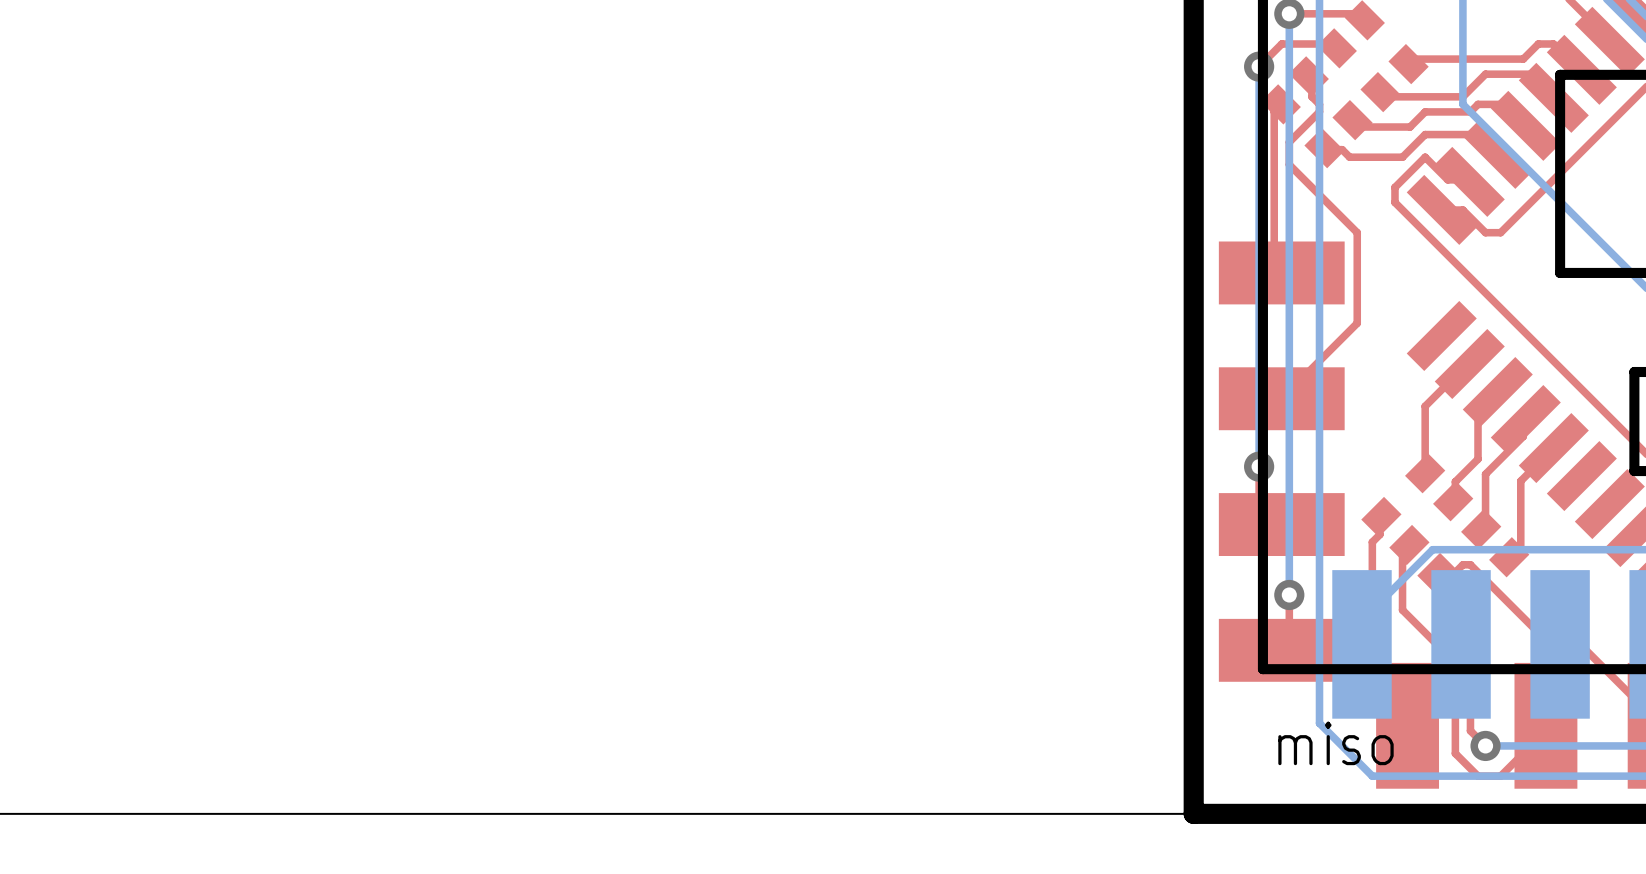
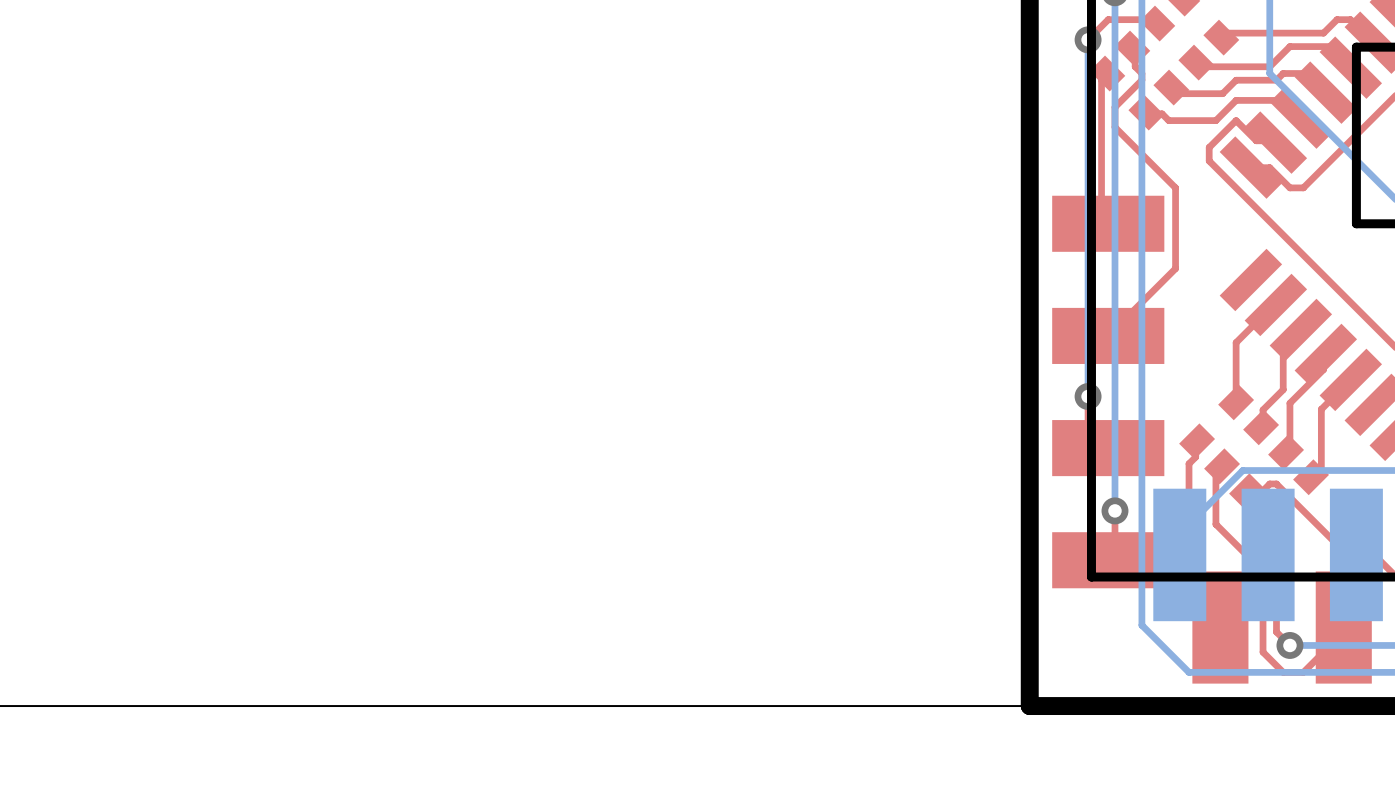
text: miso (1336, 743) -> none

